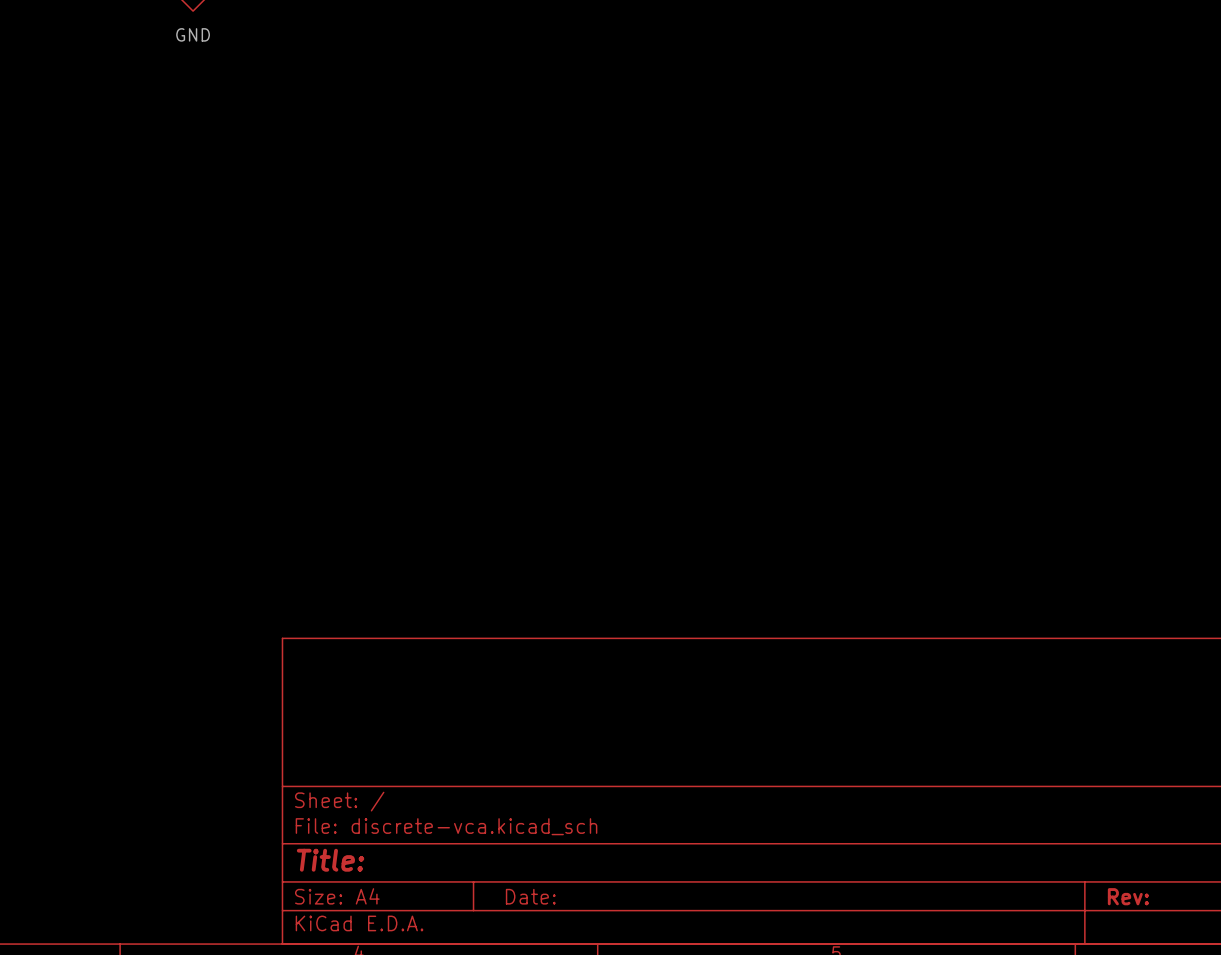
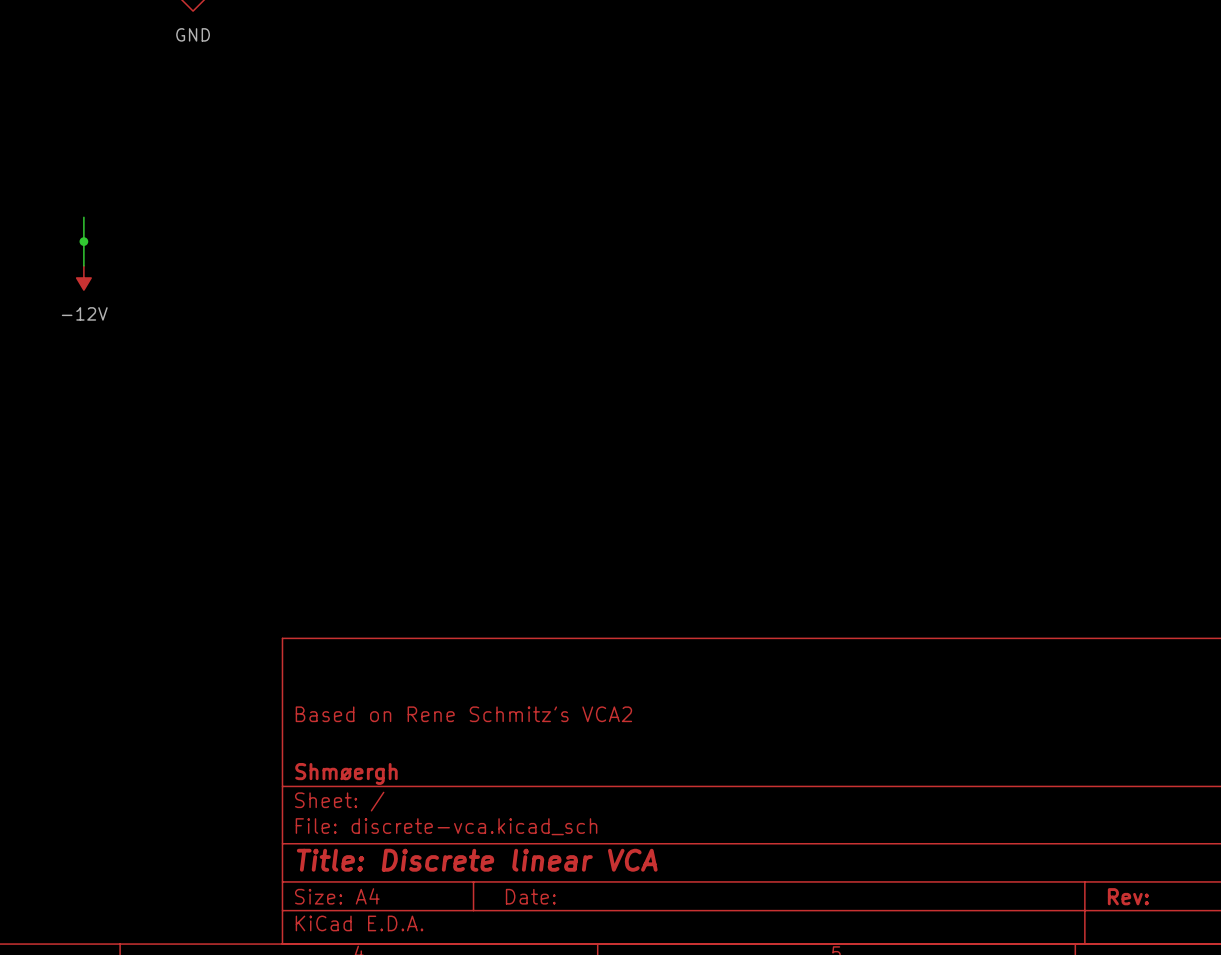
wire: none -> (83, 217) (83, 265)
junction: none -> (83, 241)
power symbol: none -> -12V (83, 277)
title block: none -> Based on Rene Schmitz's VCA2 (463, 714)
title block: none -> Shmøergh (346, 773)
title block: Title: (330, 860) -> Title: Discrete linear VCA (477, 860)

